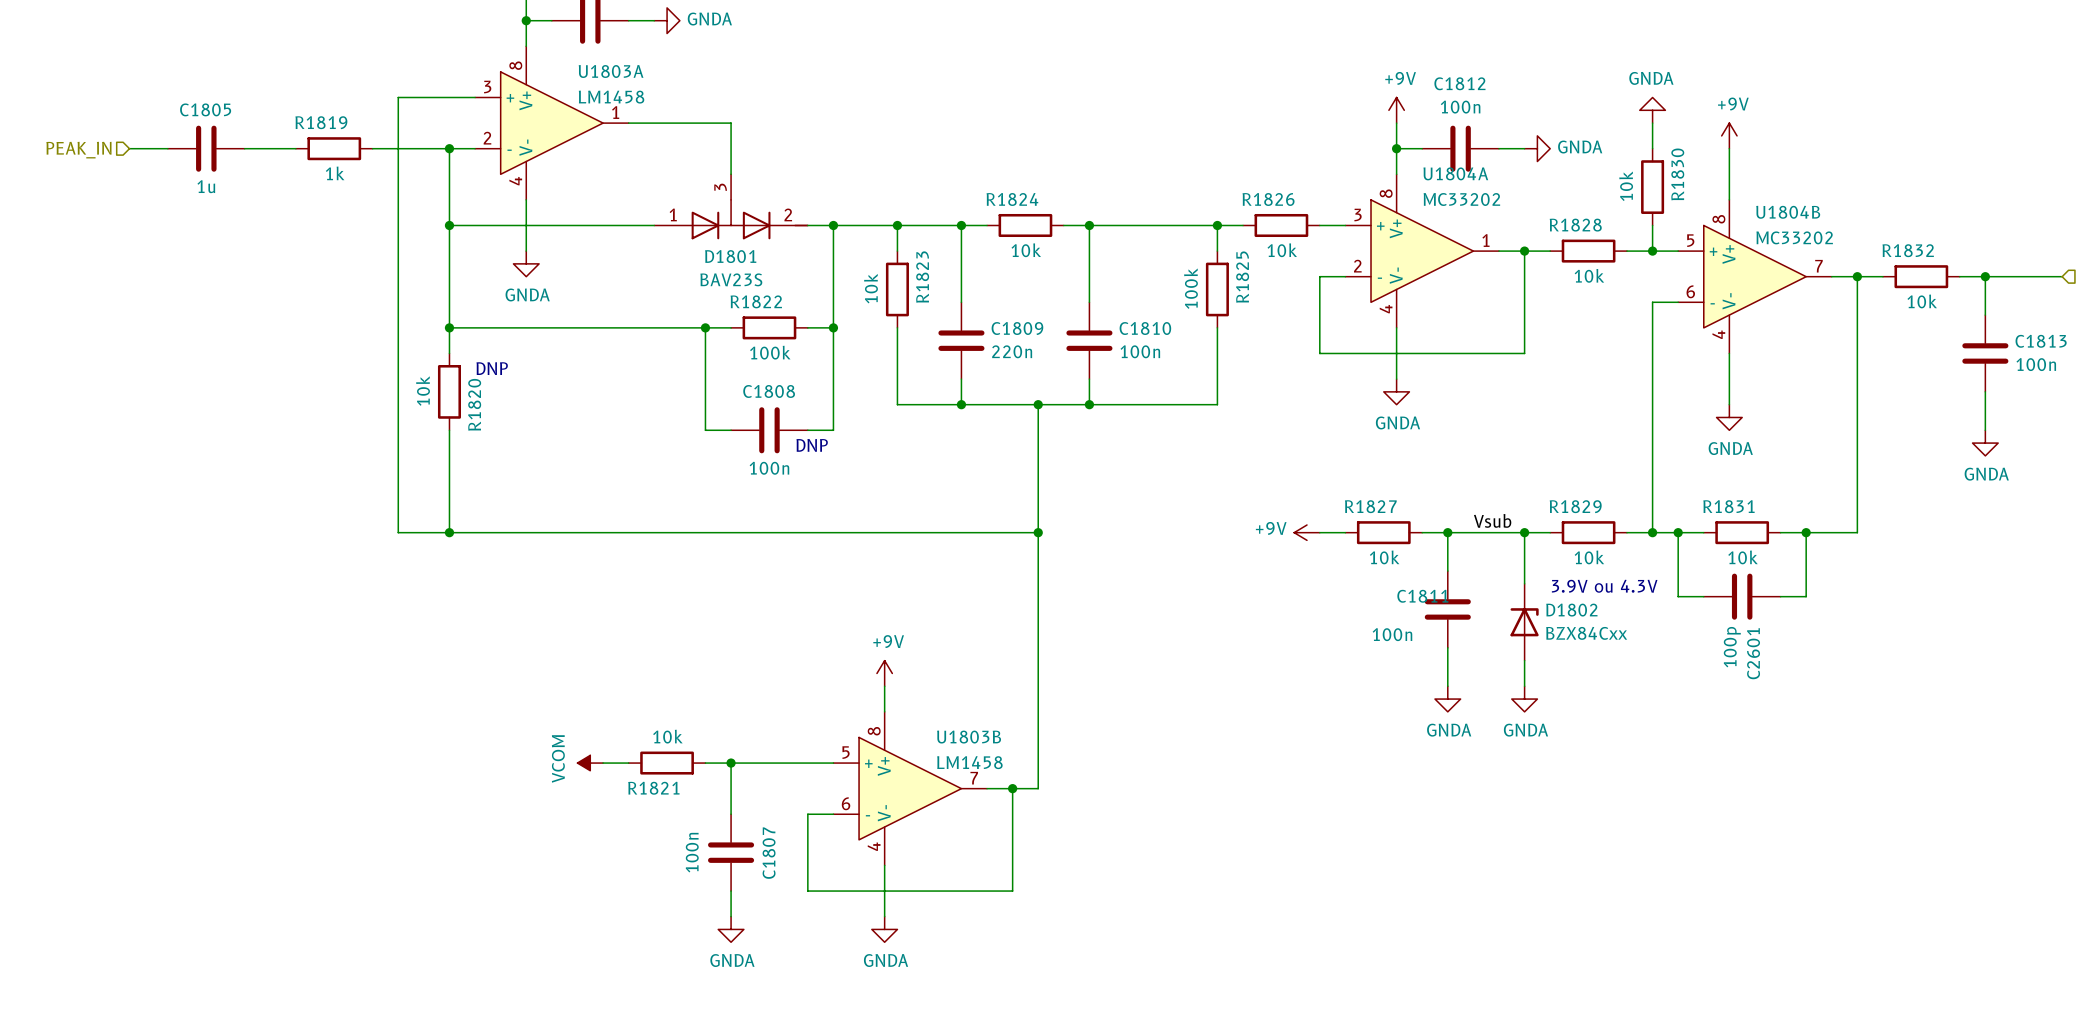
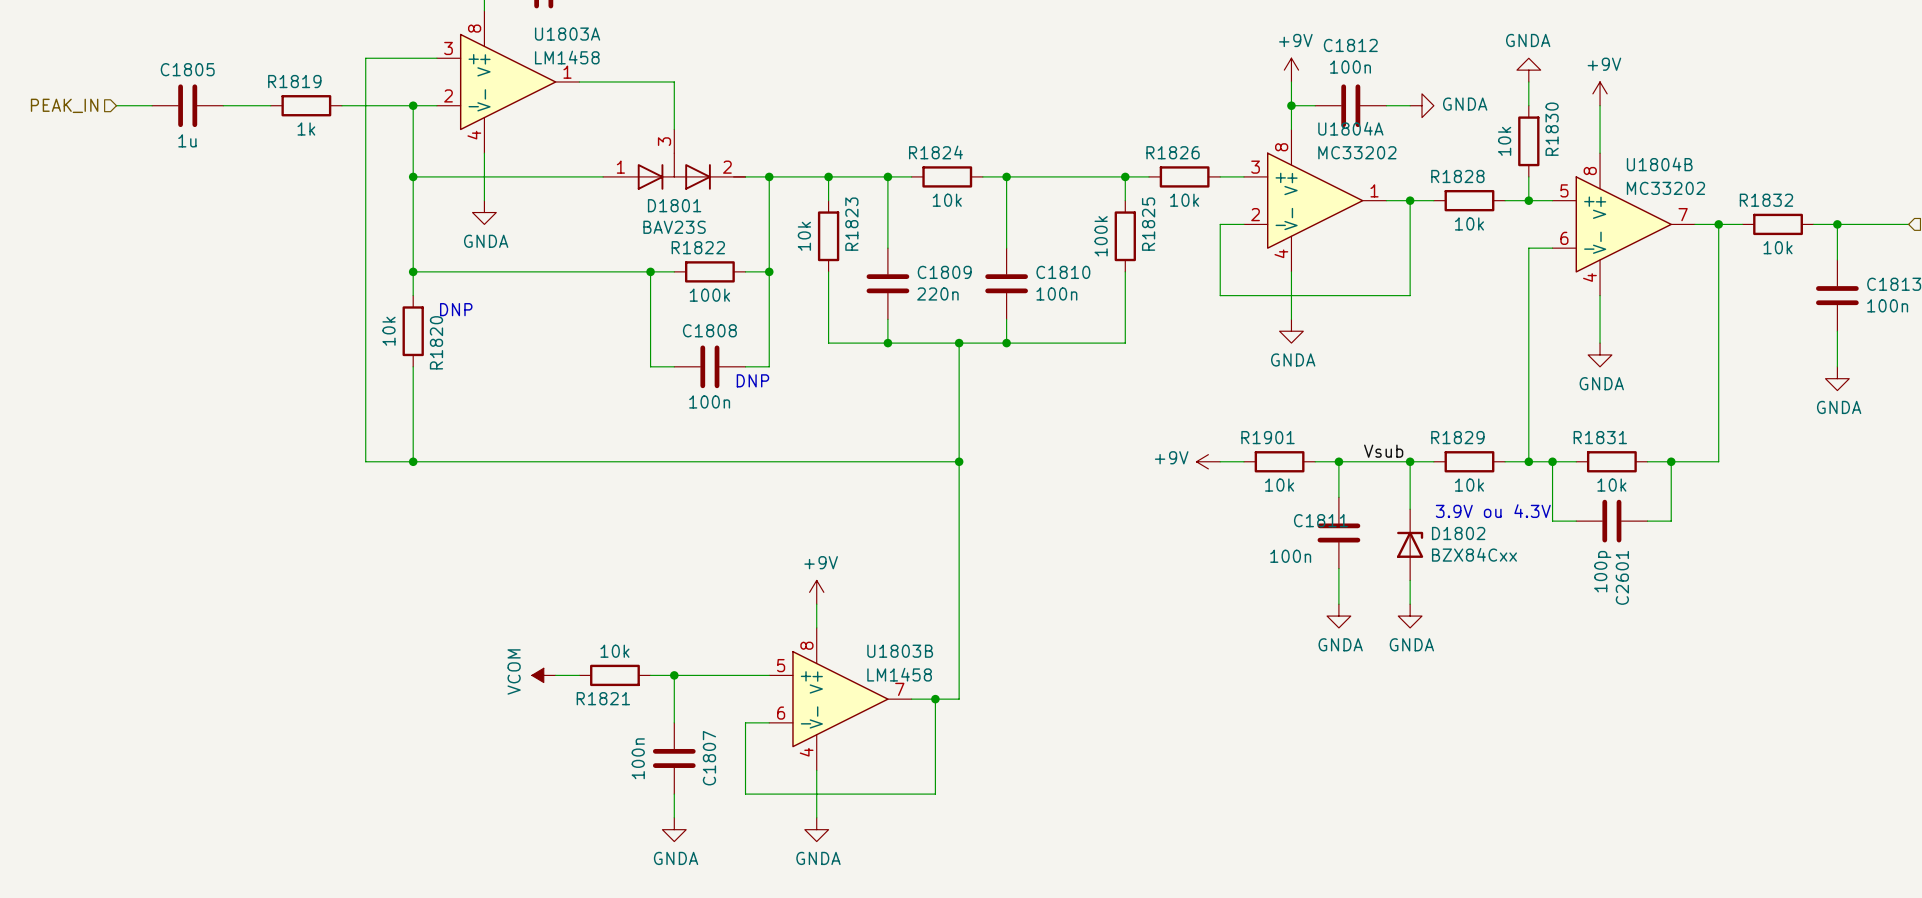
R1827 name: R1827 (1370, 506) -> R1901 (1267, 437)

